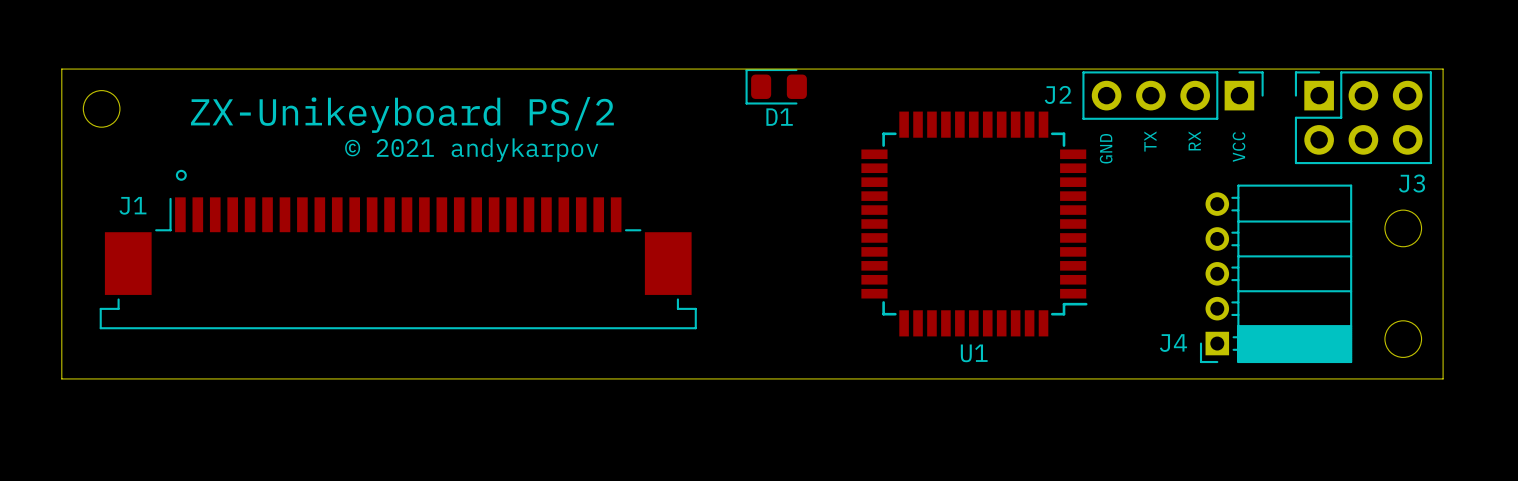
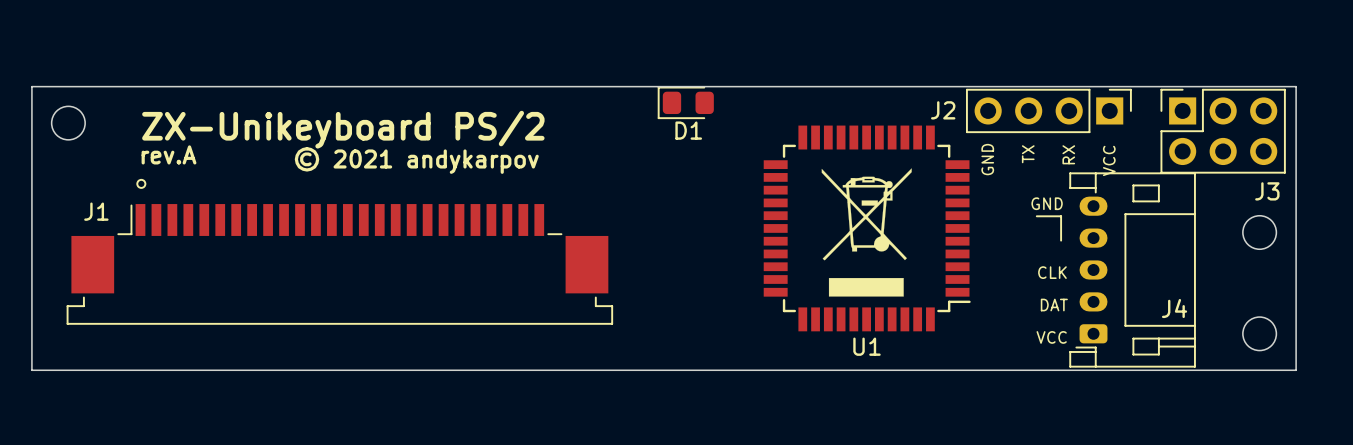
text: none -> rev.A (169, 154)
drawing: none -> [821, 168, 912, 297]
J4 footprint: [1199, 184, 1353, 364] -> [1069, 172, 1196, 368]
text: none -> GND (1047, 203)
line: none -> (1036, 216) (1061, 216) (1061, 240)
text: none -> CLK (1052, 272)
text: none -> DAT (1054, 305)
J4 name position: J4 (1173, 343) -> J4 (1174, 308)
text: none -> VCC (1051, 337)

